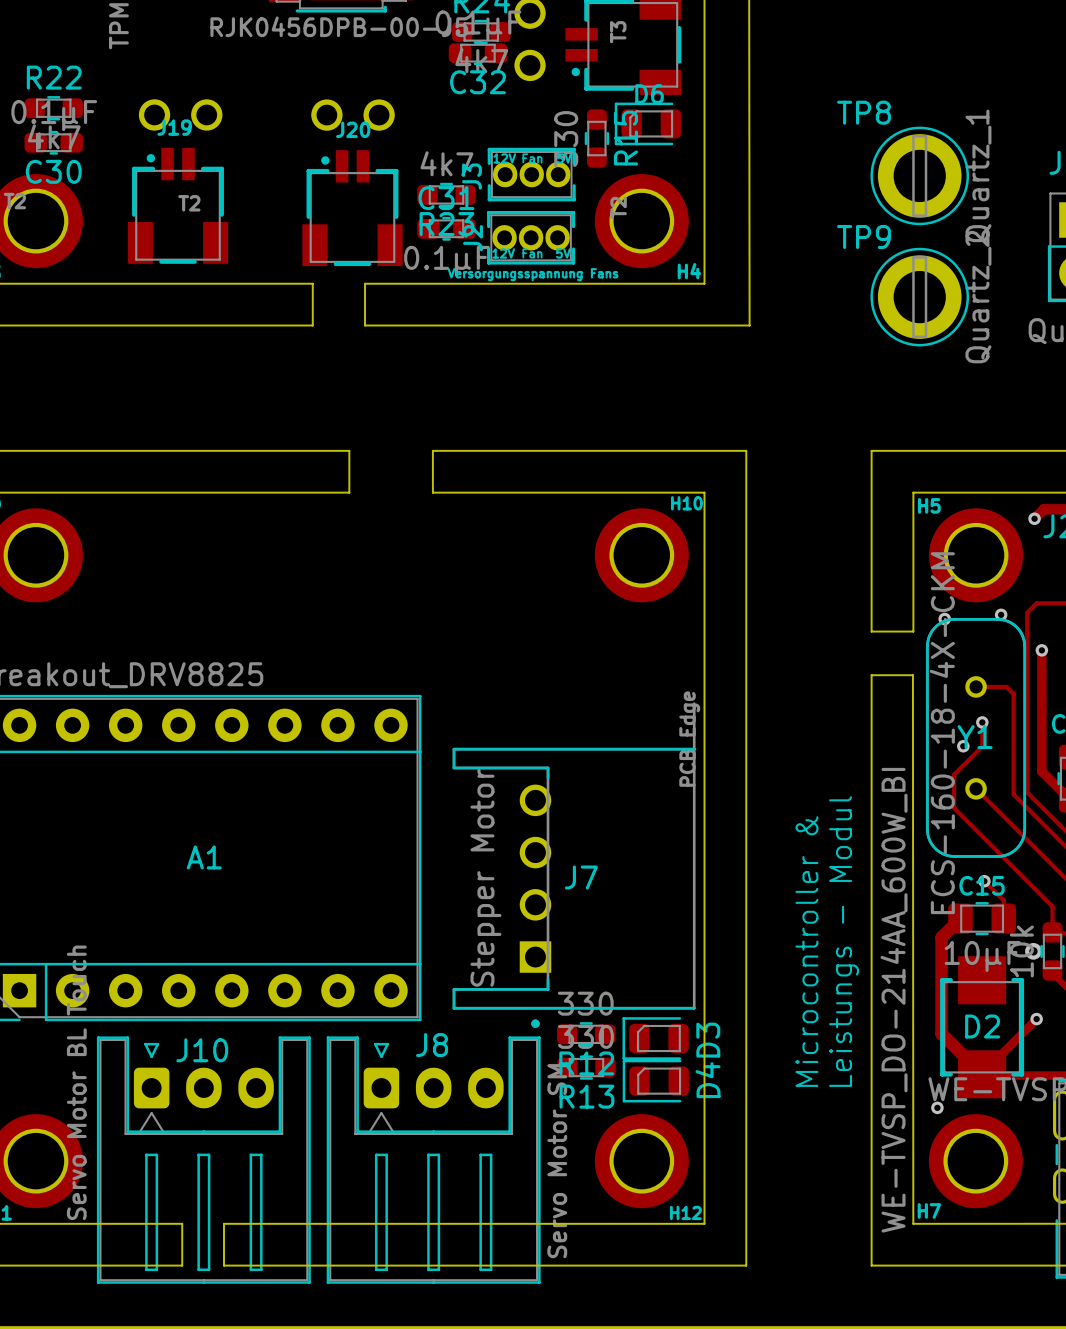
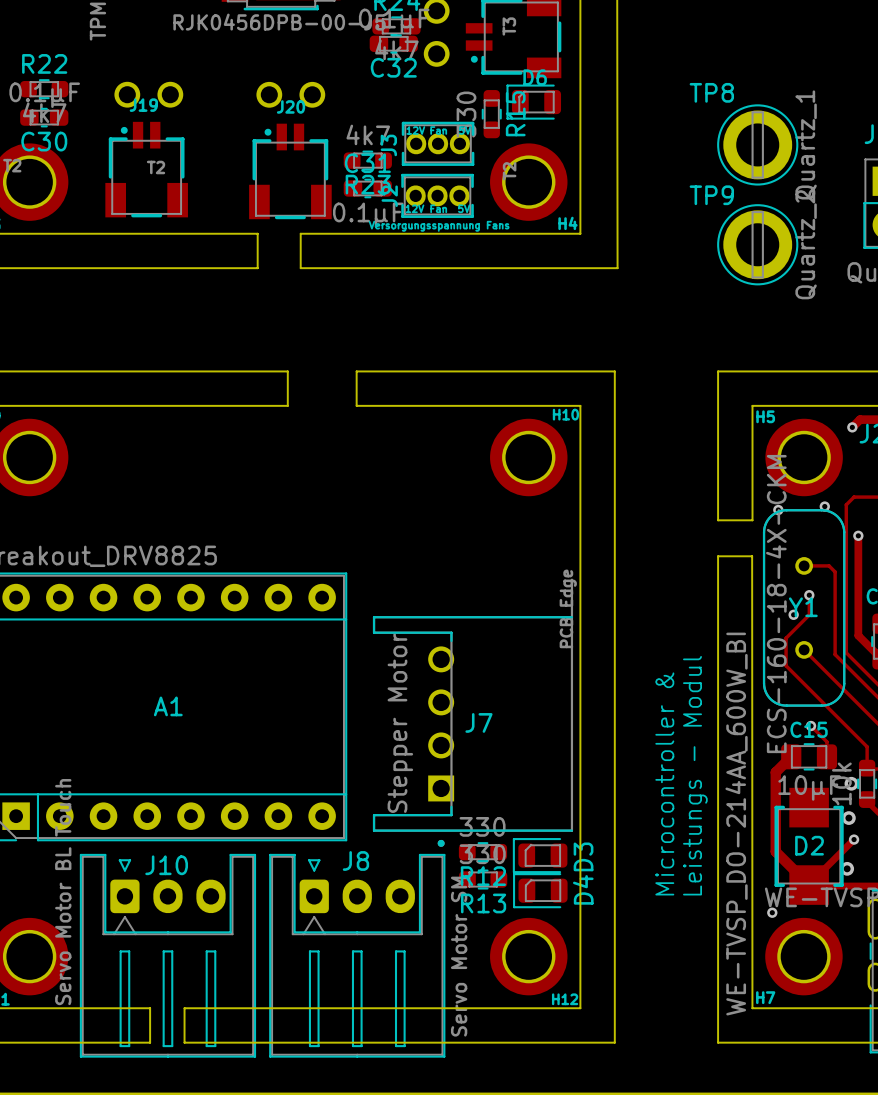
via: none -> (848, 818)
via: none -> (847, 868)

